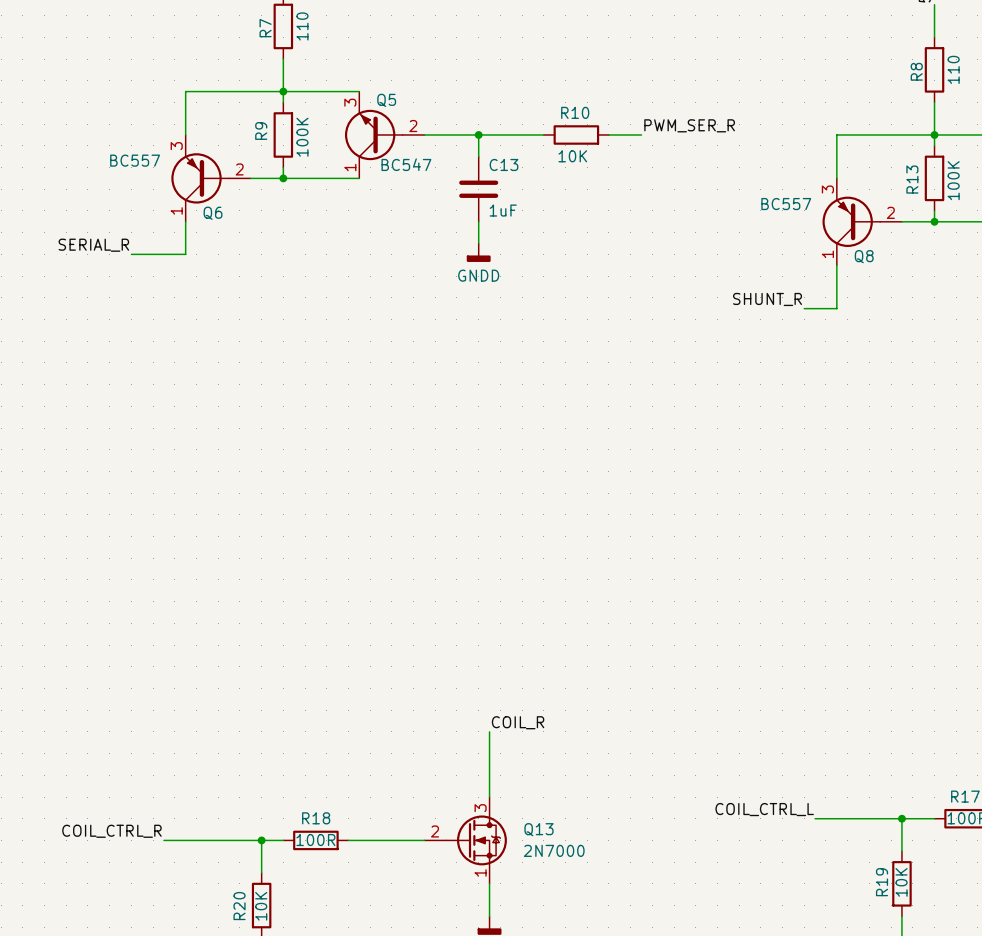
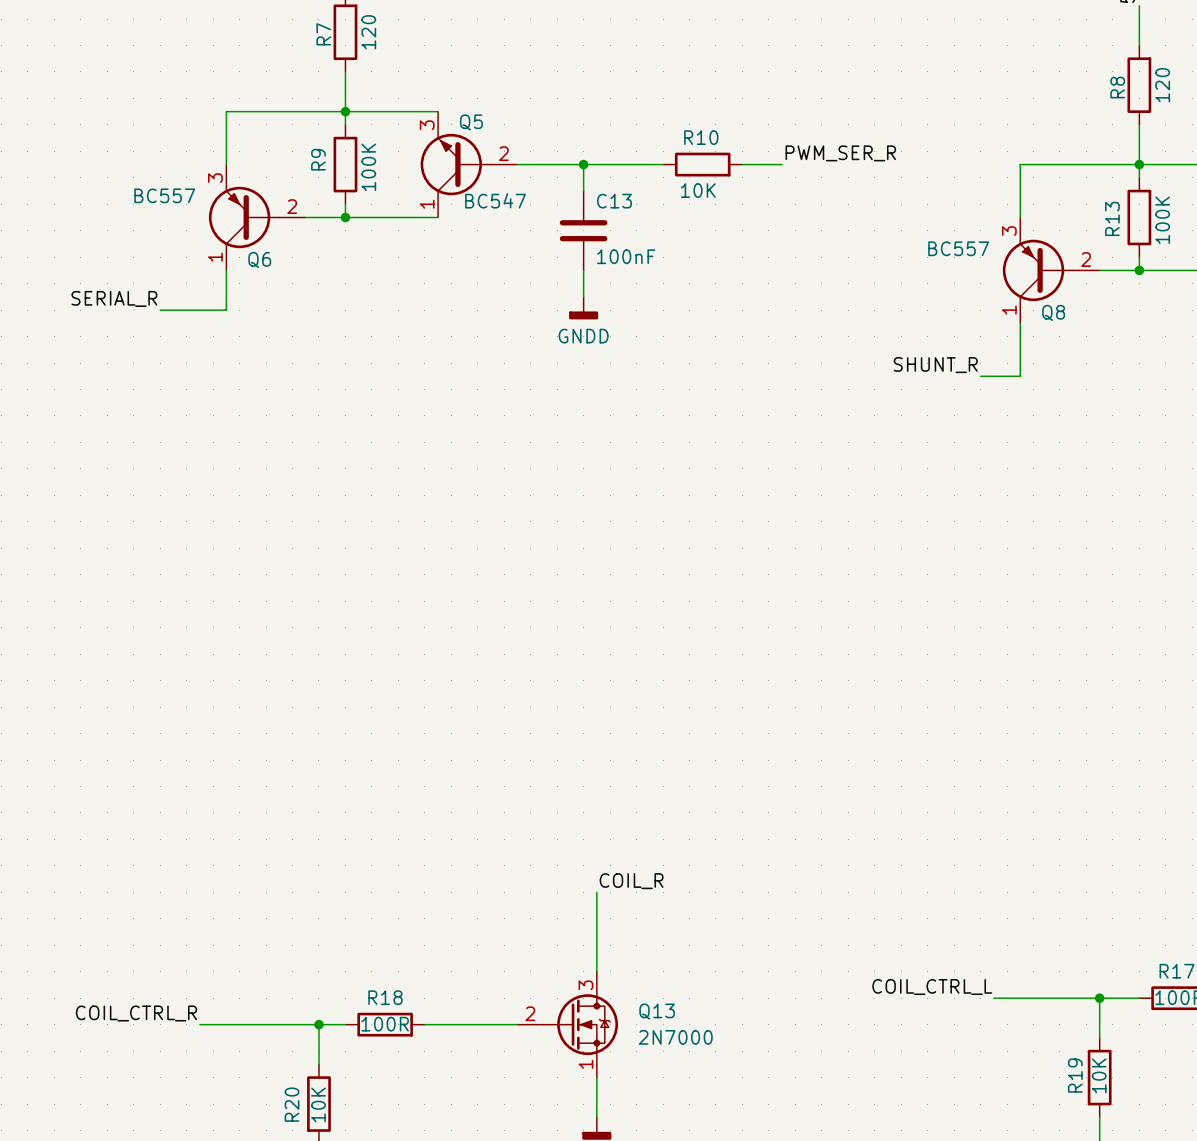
R7 value: 110 (302, 26) -> 120 (368, 32)
R8 value: 110 (953, 69) -> 120 (1162, 85)
C13 value: 1uF (503, 210) -> 100nF (626, 256)

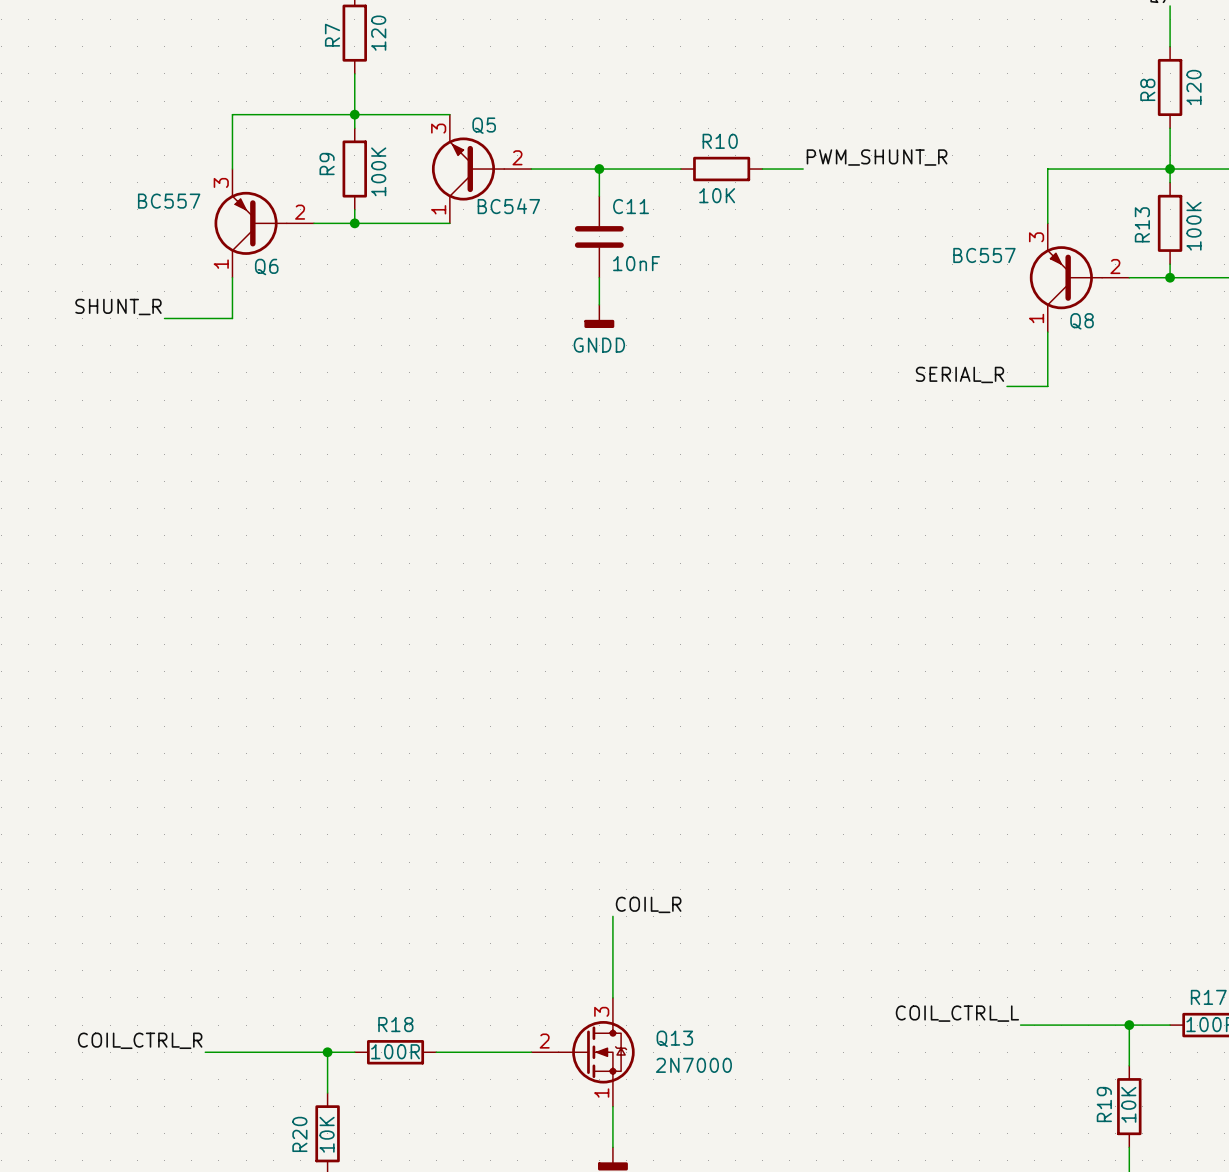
label: PWM_SER_R (840, 153) -> PWM_SHUNT_R (877, 157)
C13 name: C13 (614, 201) -> C11 (631, 206)
C13 value: 100nF (626, 256) -> 10nF (636, 263)
label: SERIAL_R (114, 298) -> SHUNT_R (118, 307)
label: SHUNT_R (935, 365) -> SERIAL_R (959, 374)

